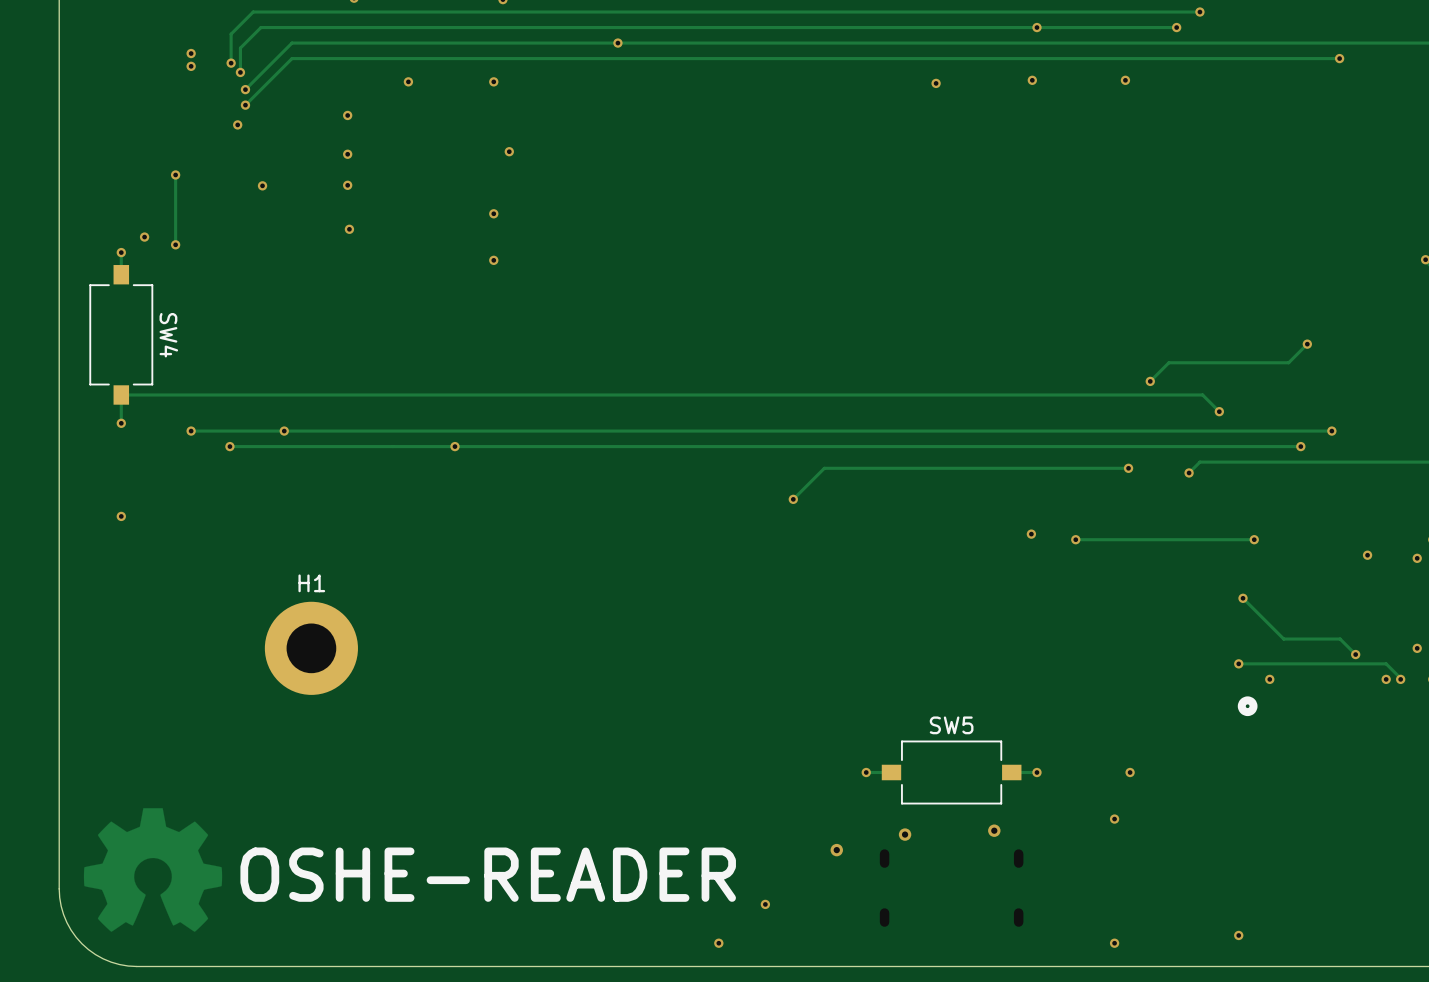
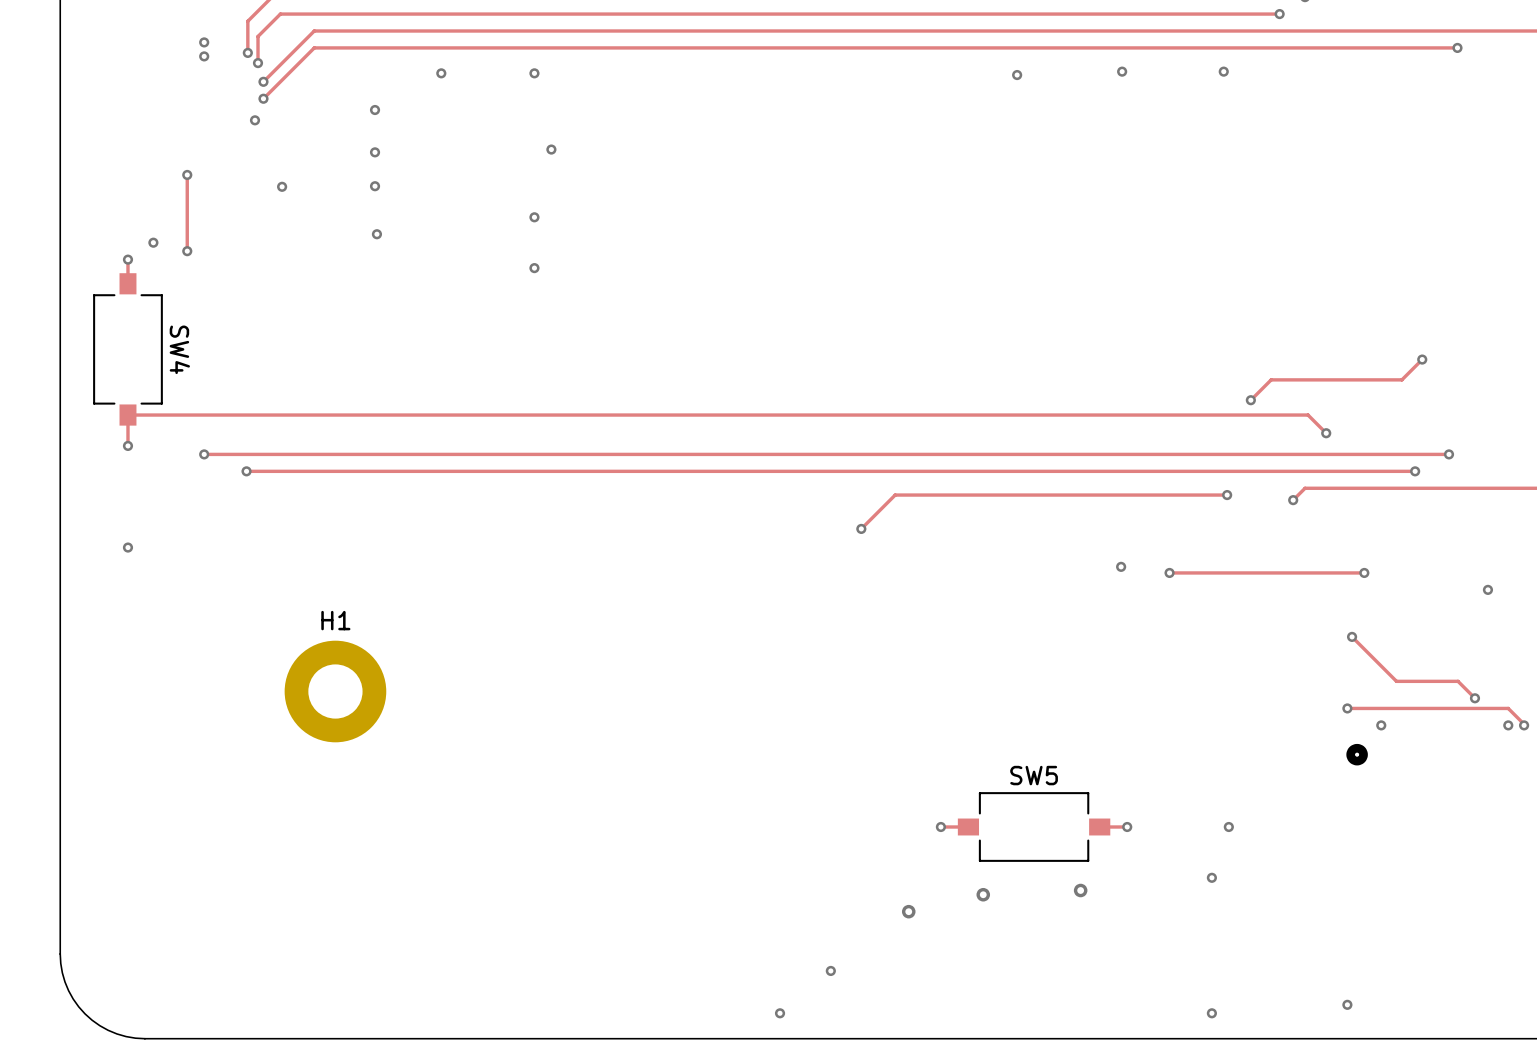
via: (1036, 27) -> none
via: (617, 43) -> none
via: (284, 431) -> none
via: (454, 446) -> none
drawing: [83, 808, 223, 932] -> none
text: OSHE-READER (488, 874) -> none

